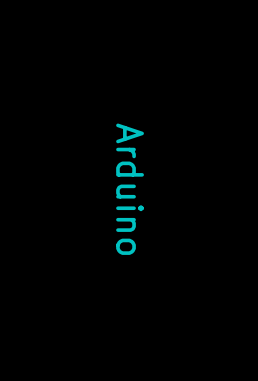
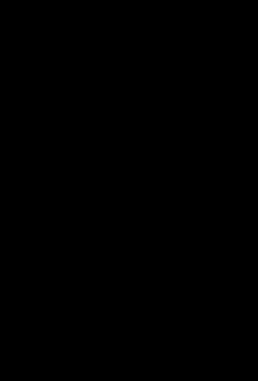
text: Arduino (130, 189) -> none

